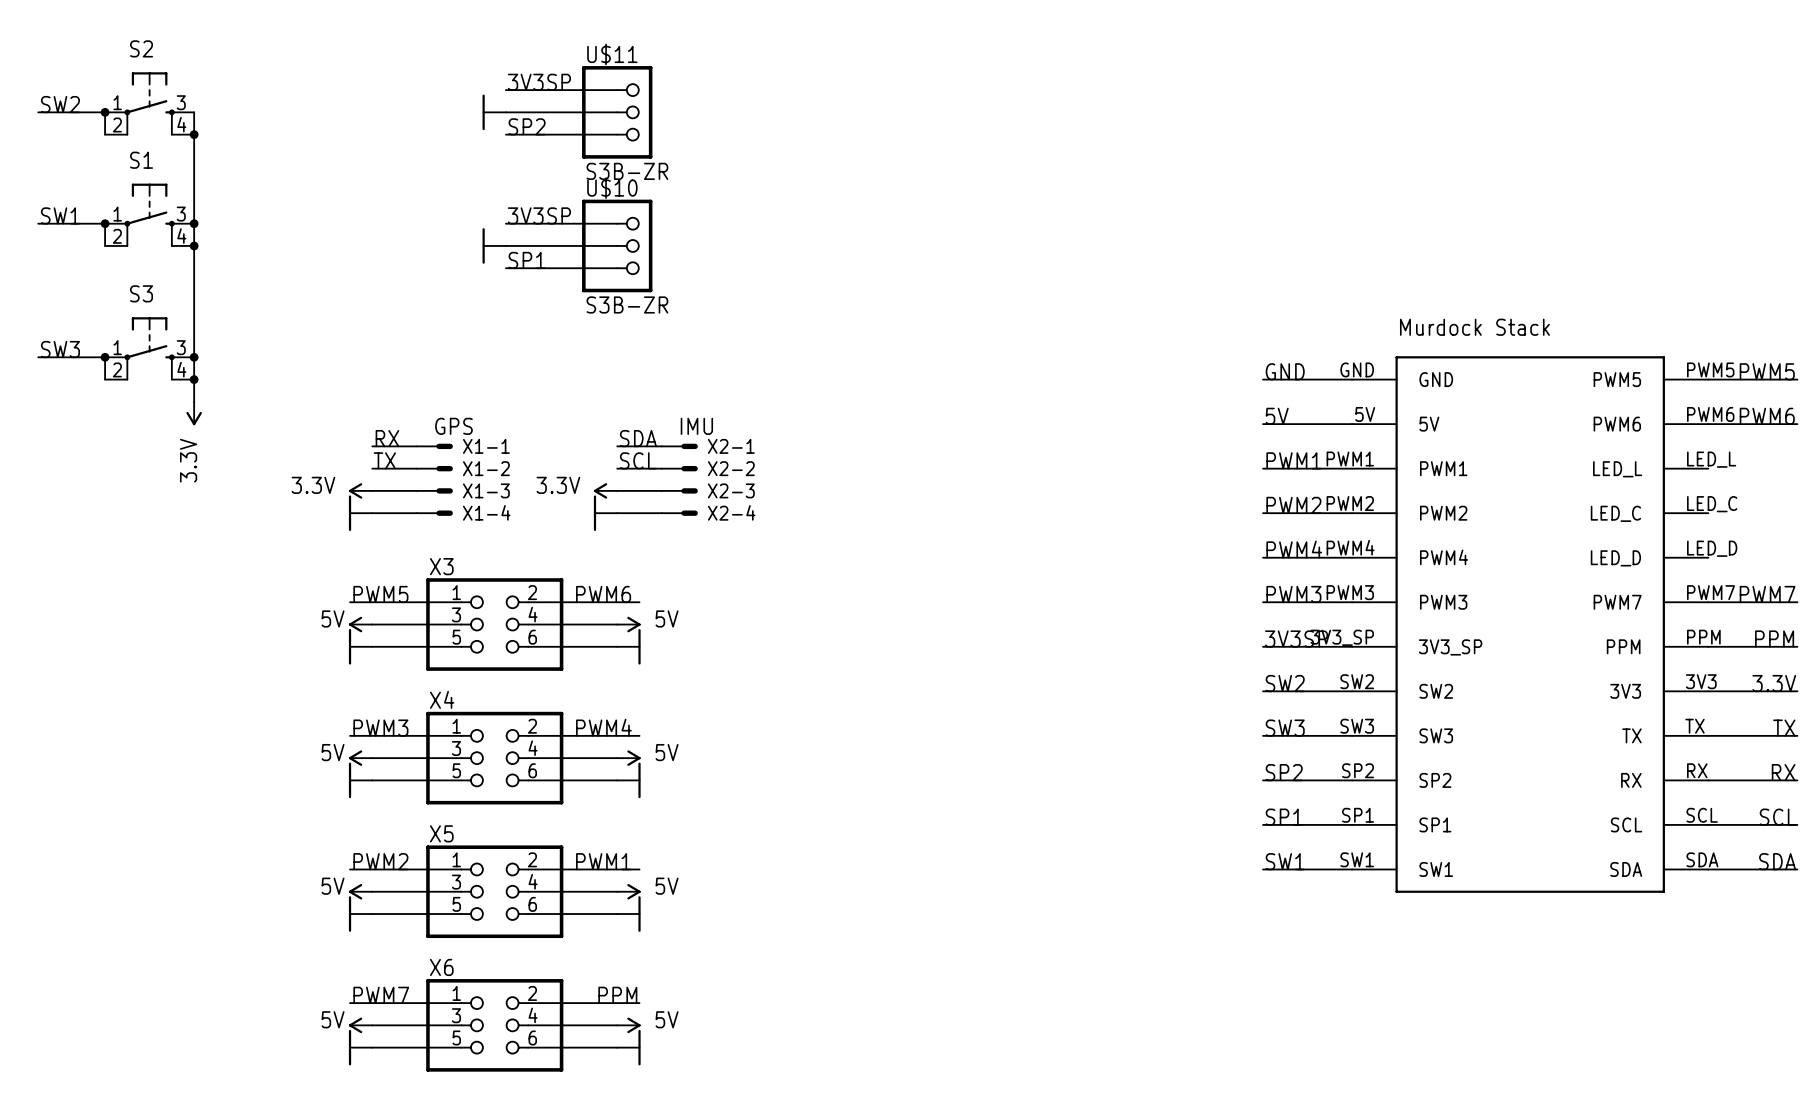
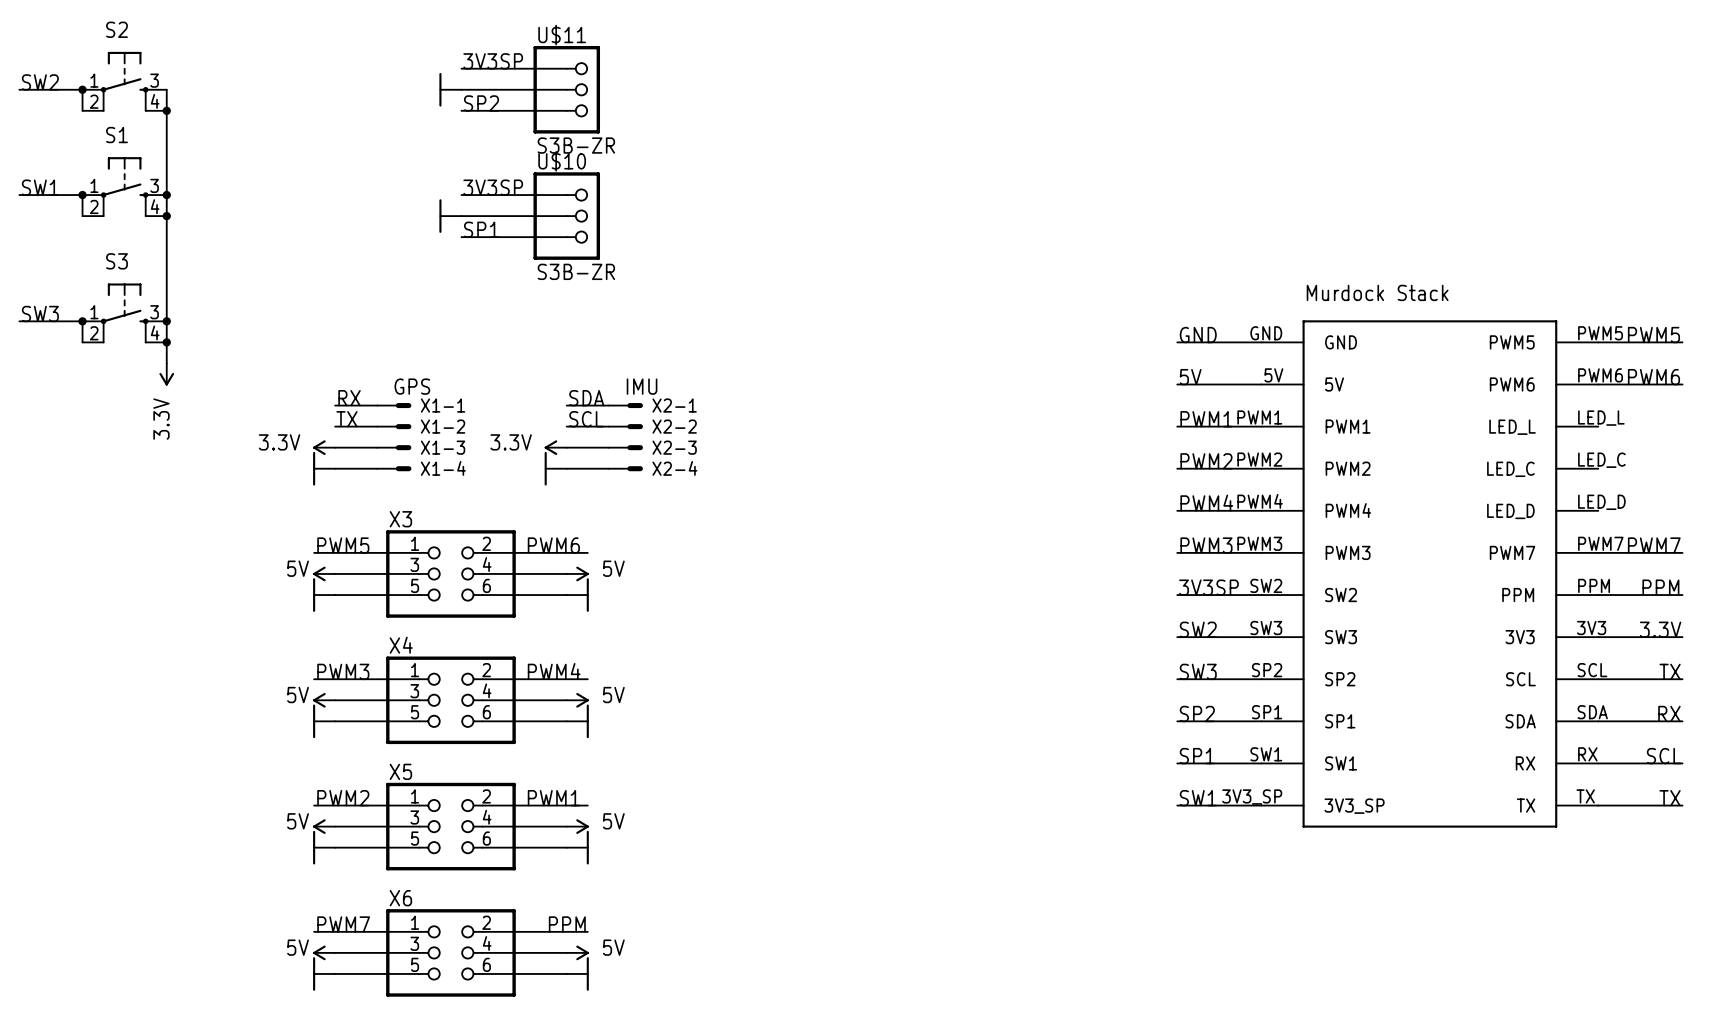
part symbol: [1352, 356, 1709, 893] -> [1261, 320, 1599, 828]
label: SDA (1777, 861) -> TX (1670, 798)

